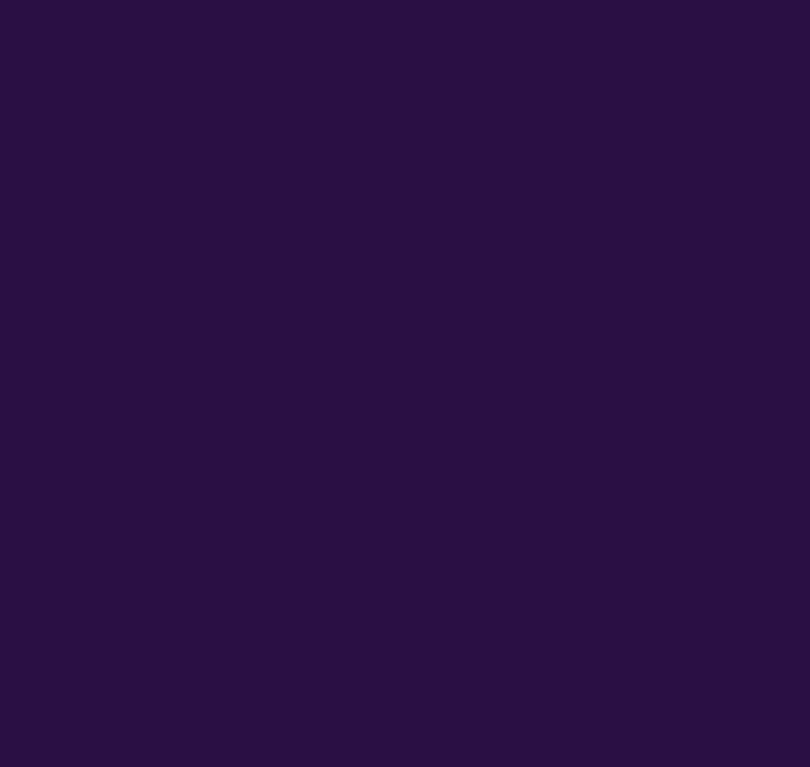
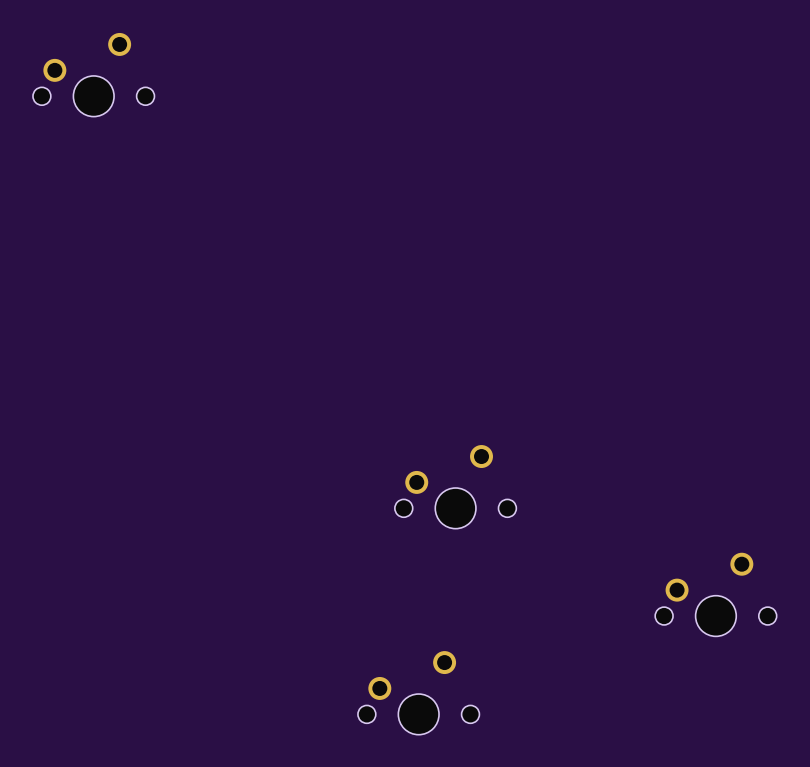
part: none -> (93, 74)
part: none -> (455, 486)
part: none -> (715, 594)
part: none -> (418, 692)

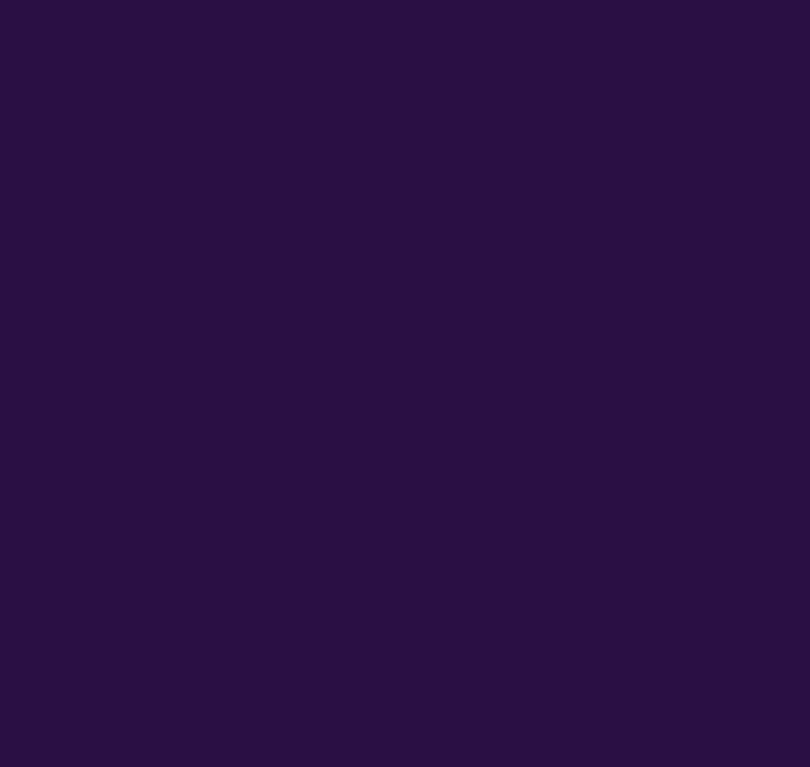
part: (93, 74) -> none
part: (455, 486) -> none
part: (715, 594) -> none
part: (418, 692) -> none

